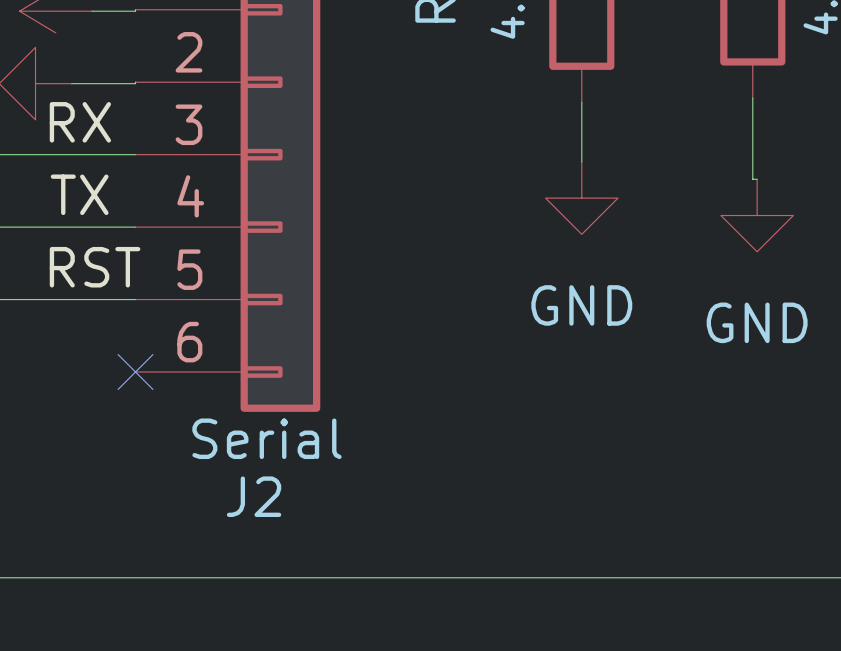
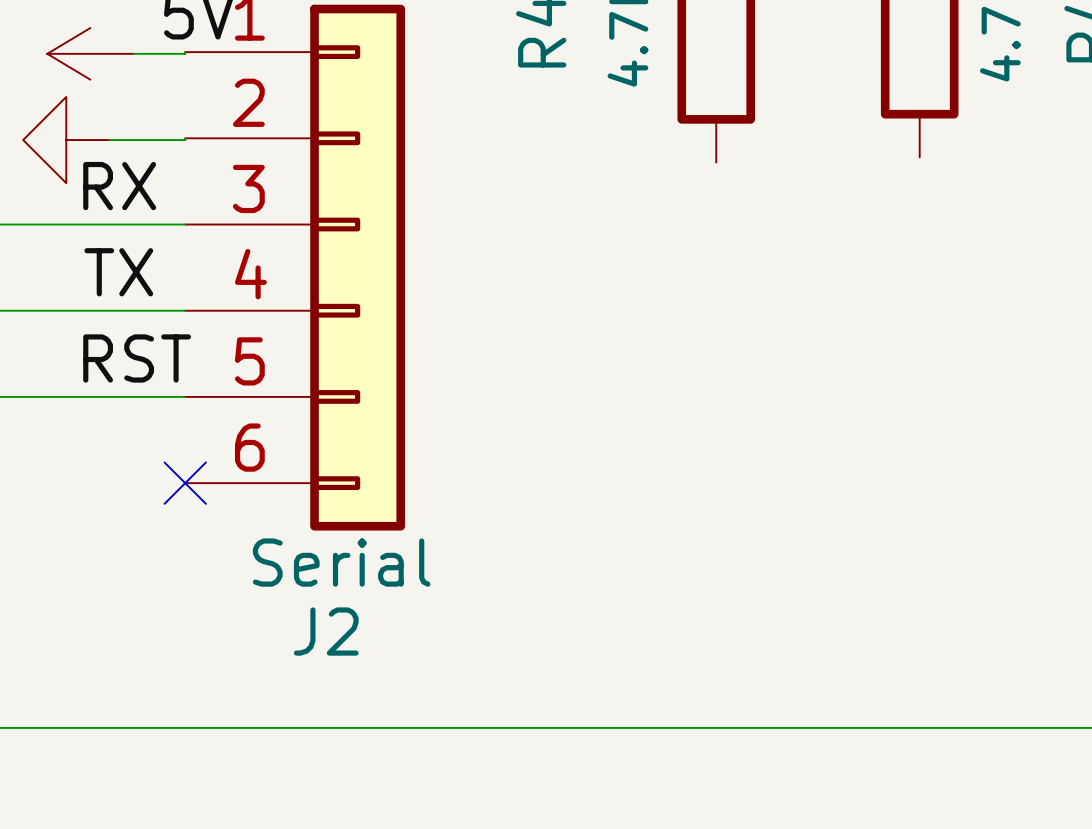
wire: (752, 98) (752, 179) (757, 179) -> none
wire: (581, 102) (581, 161) -> none
power symbol: GND (581, 198) -> none
power symbol: GND (757, 215) -> none

